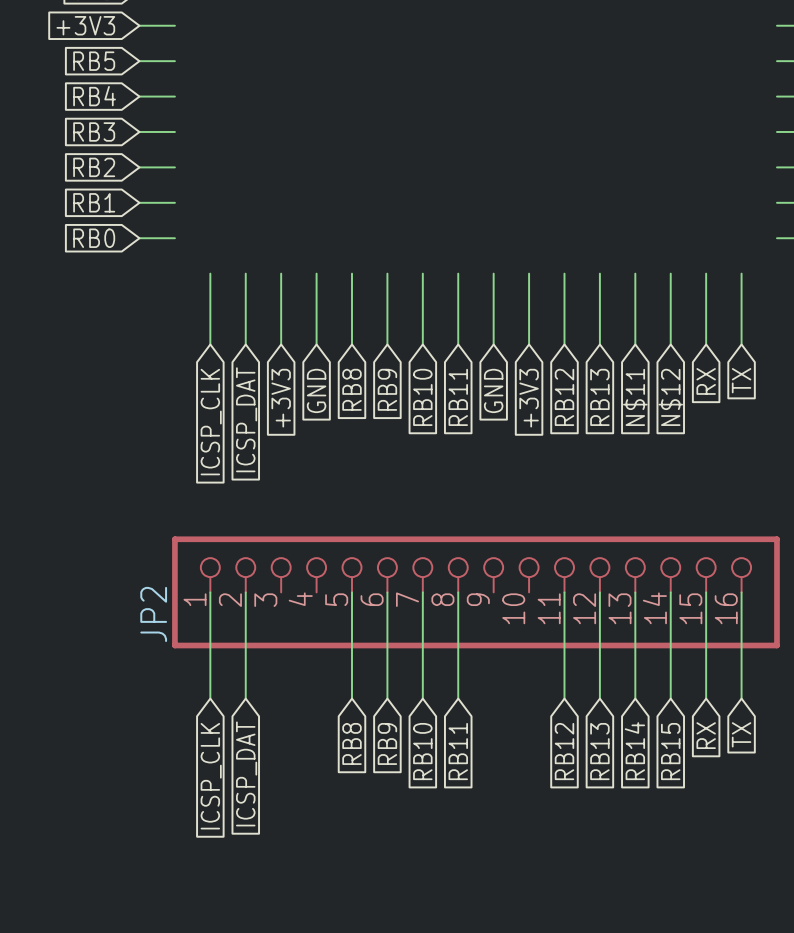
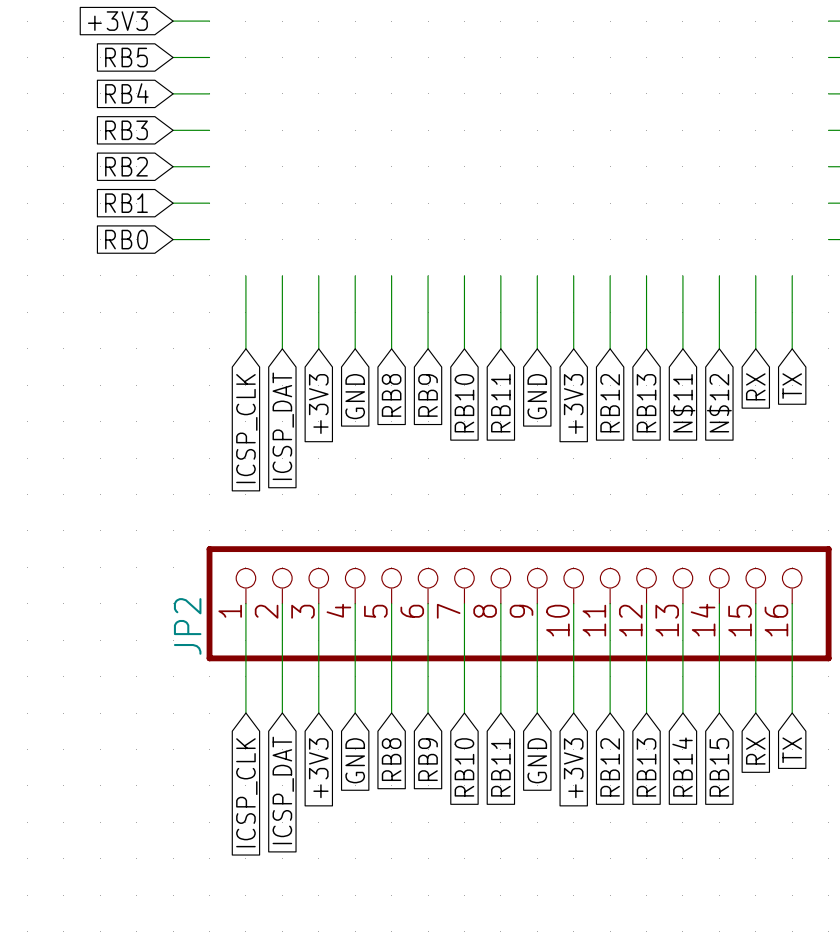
wire: none -> (318, 603) (318, 713)
wire: none -> (355, 603) (355, 713)
wire: none -> (537, 603) (537, 713)
wire: none -> (573, 603) (573, 713)
global label: none -> GND (355, 760)
global label: none -> GND (537, 760)
global label: none -> +3V3 (318, 768)
global label: none -> +3V3 (573, 768)

